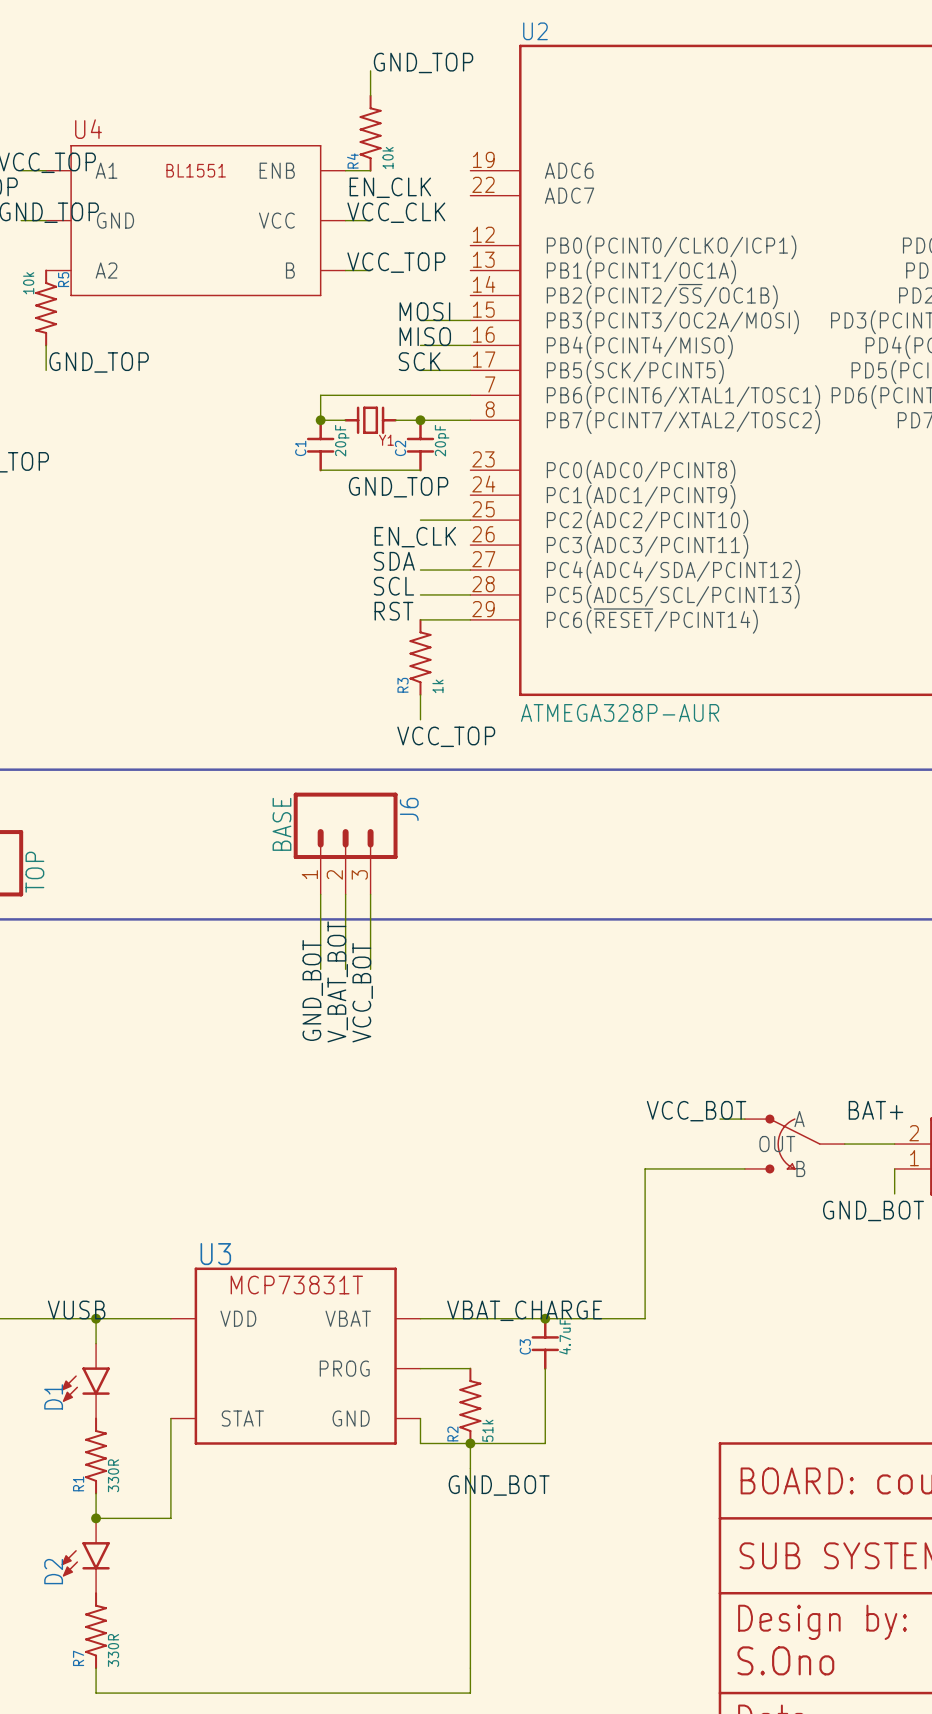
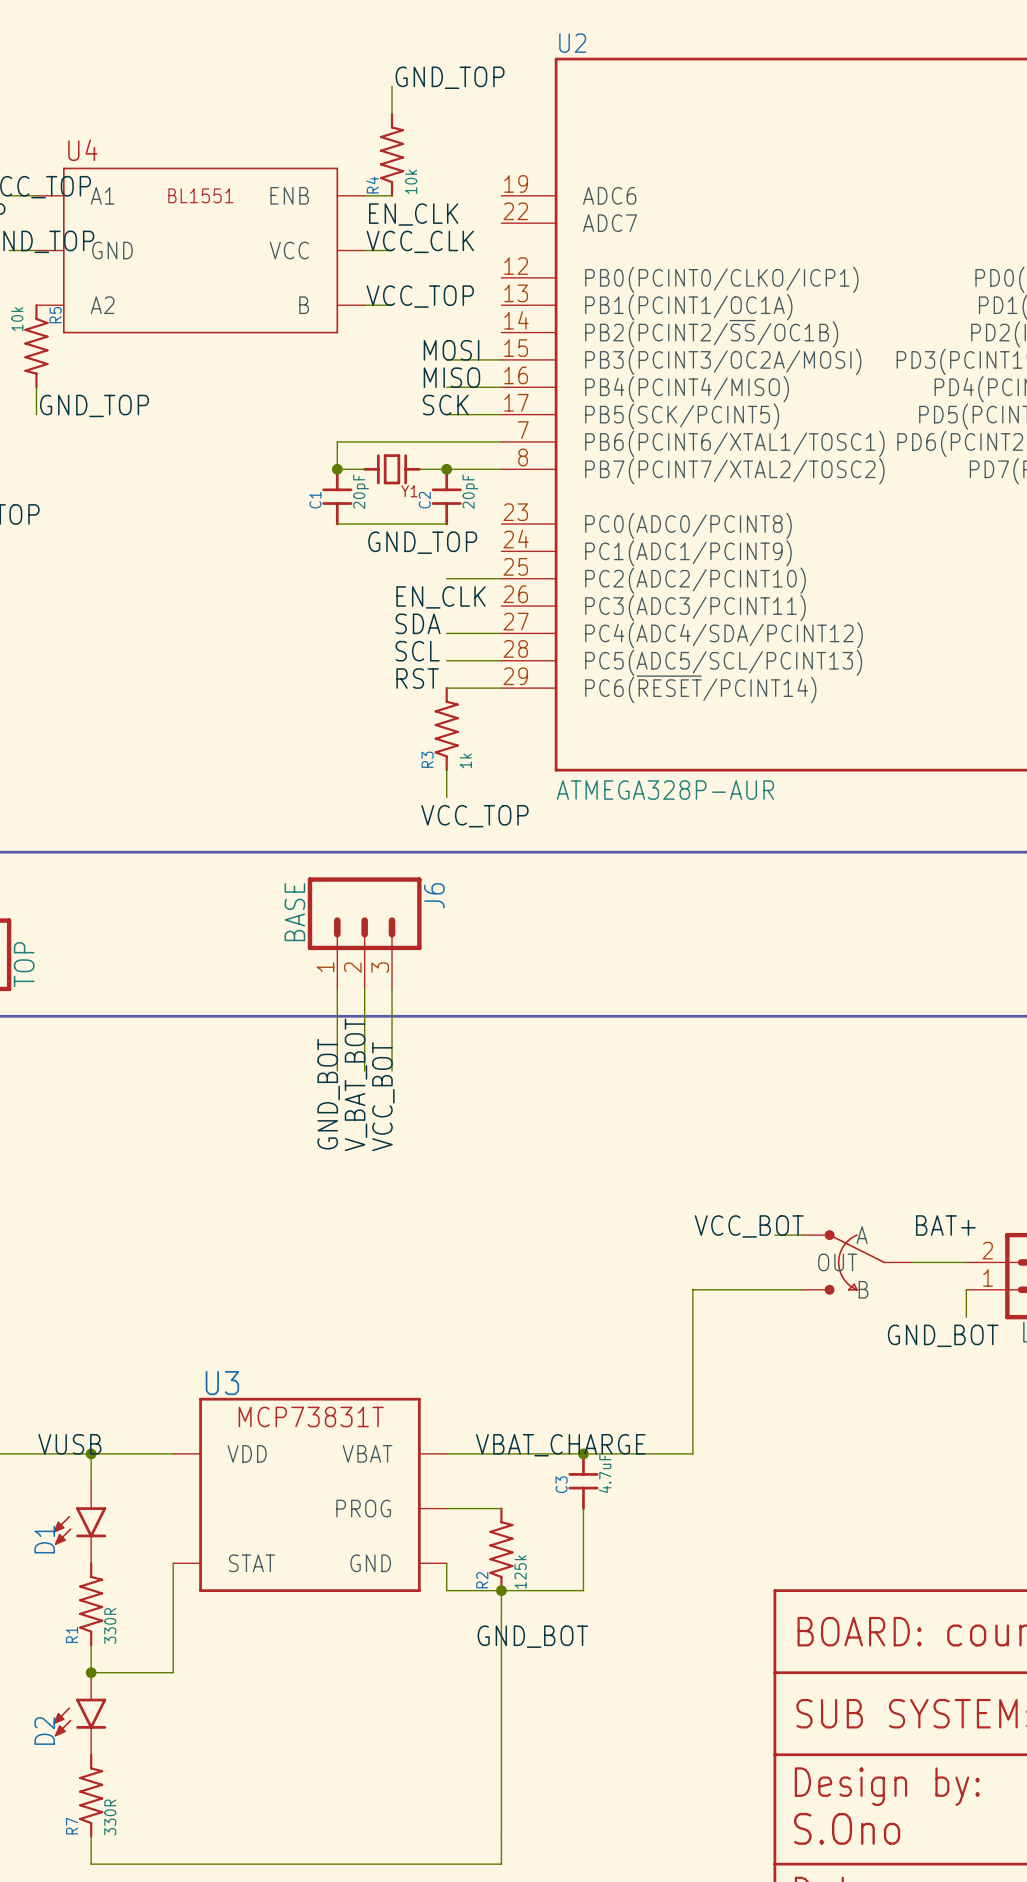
R2 value: 51k (487, 1430) -> 125k (520, 1572)

